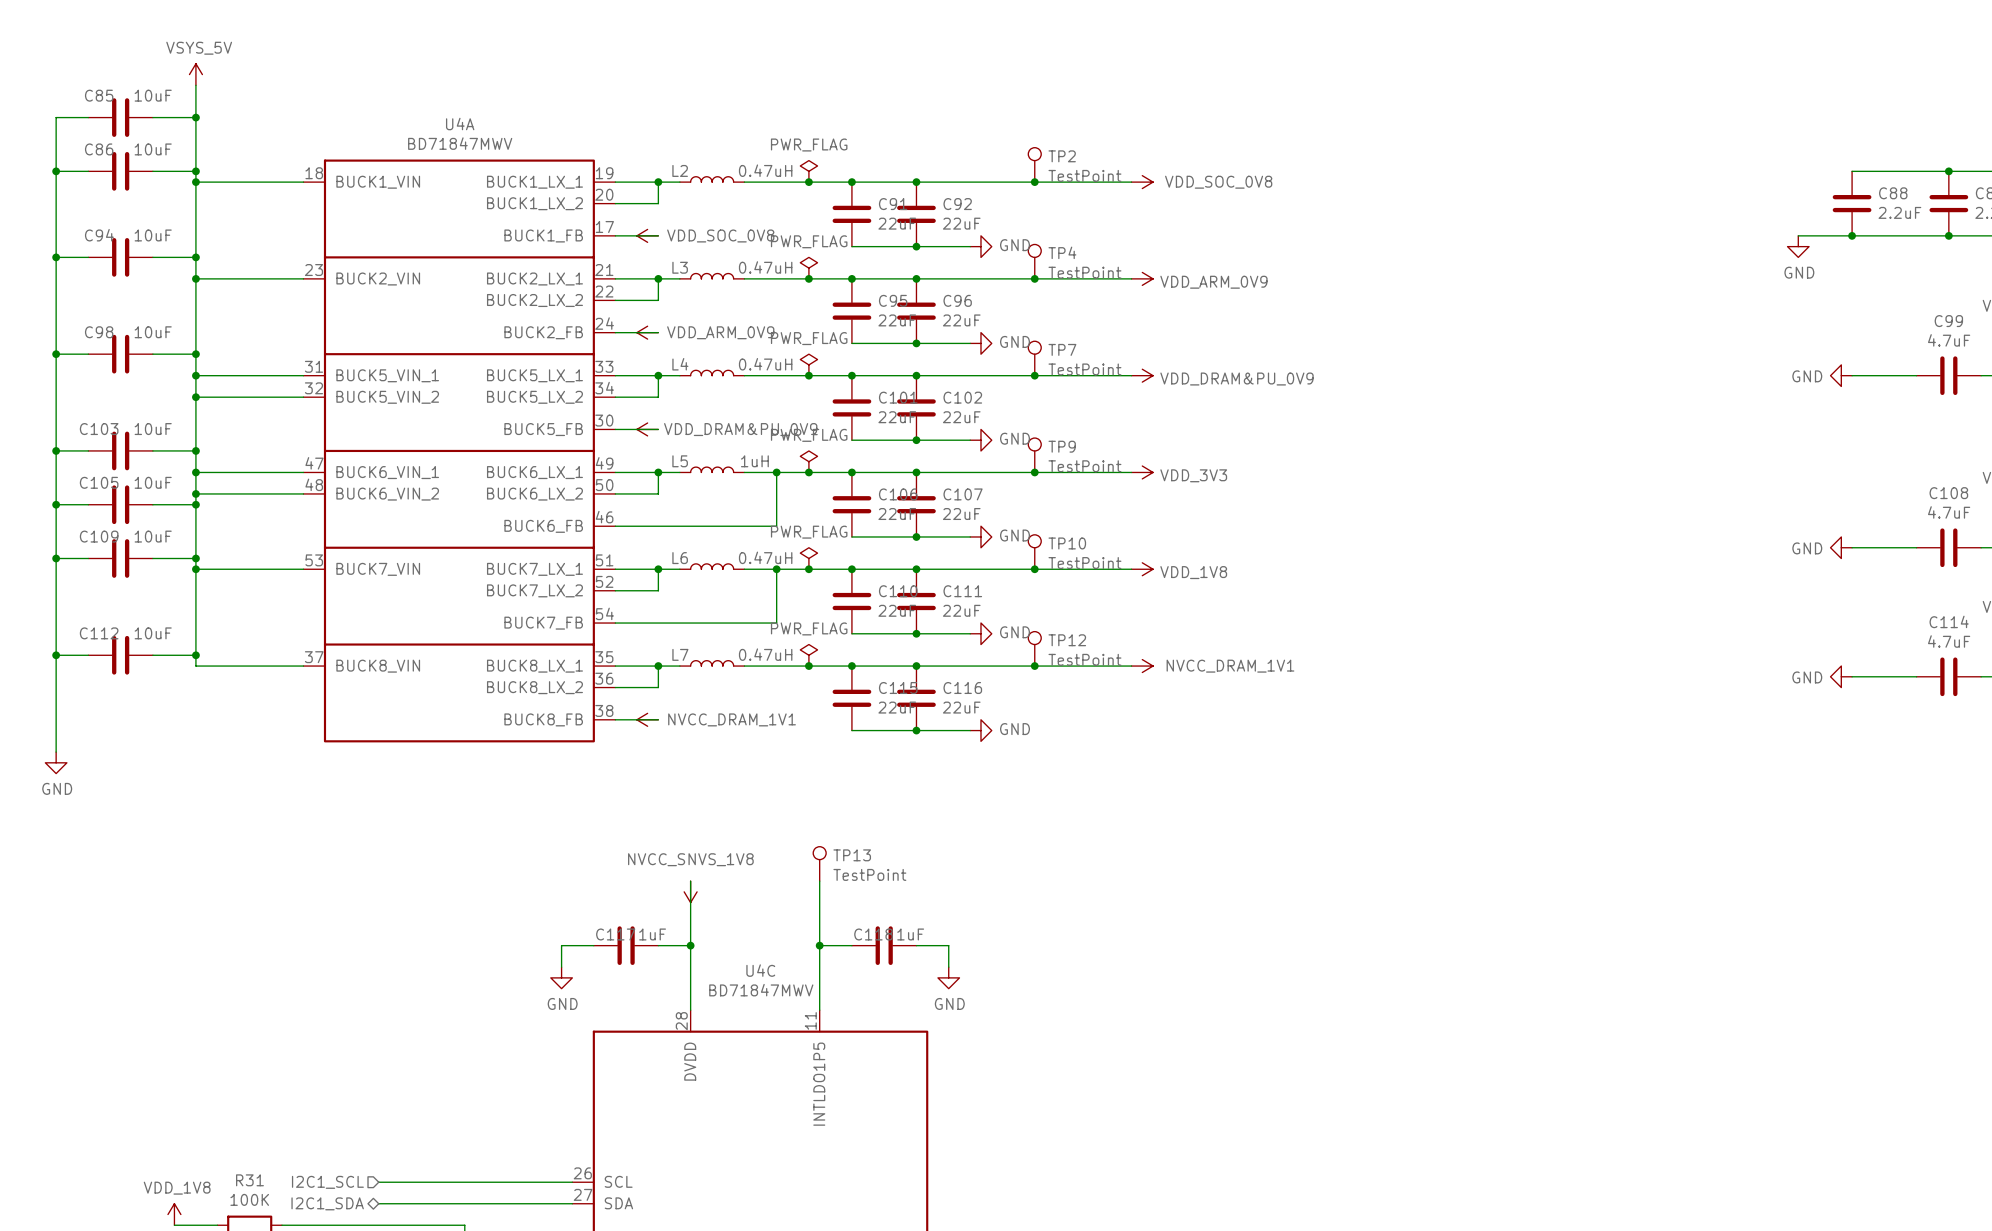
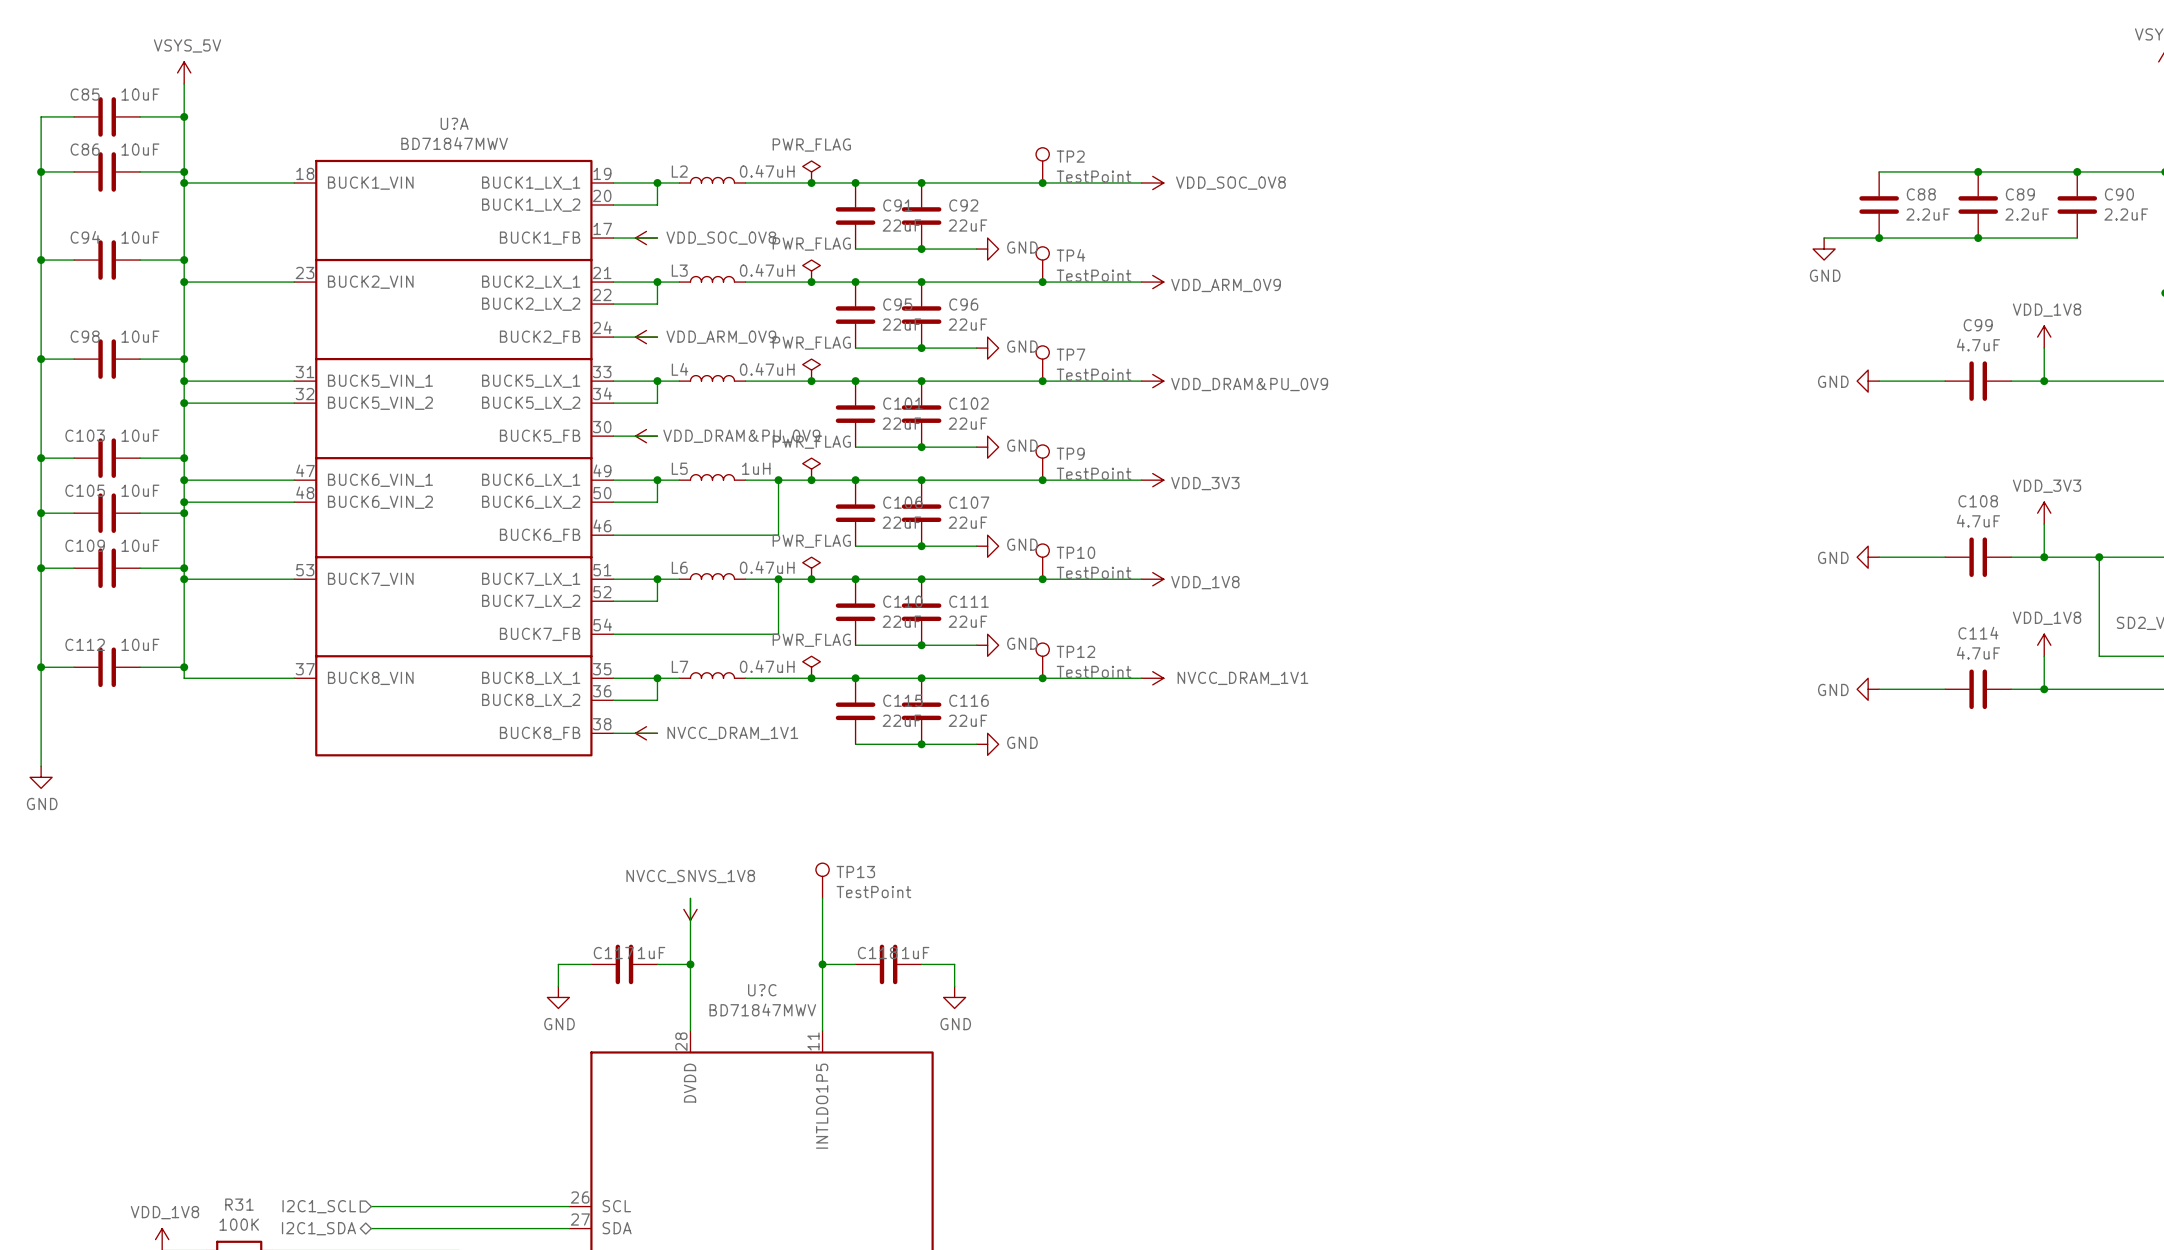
U4A name: U4A (460, 124) -> U?A (454, 123)
U4C name: U4C (760, 970) -> U?C (762, 990)

